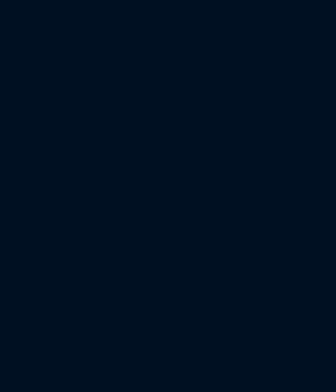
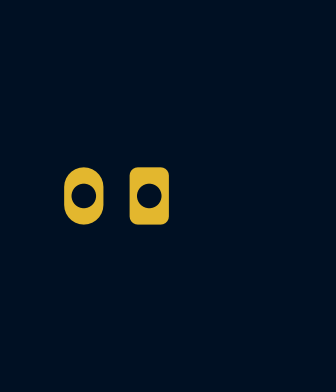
part: none -> (116, 195)

